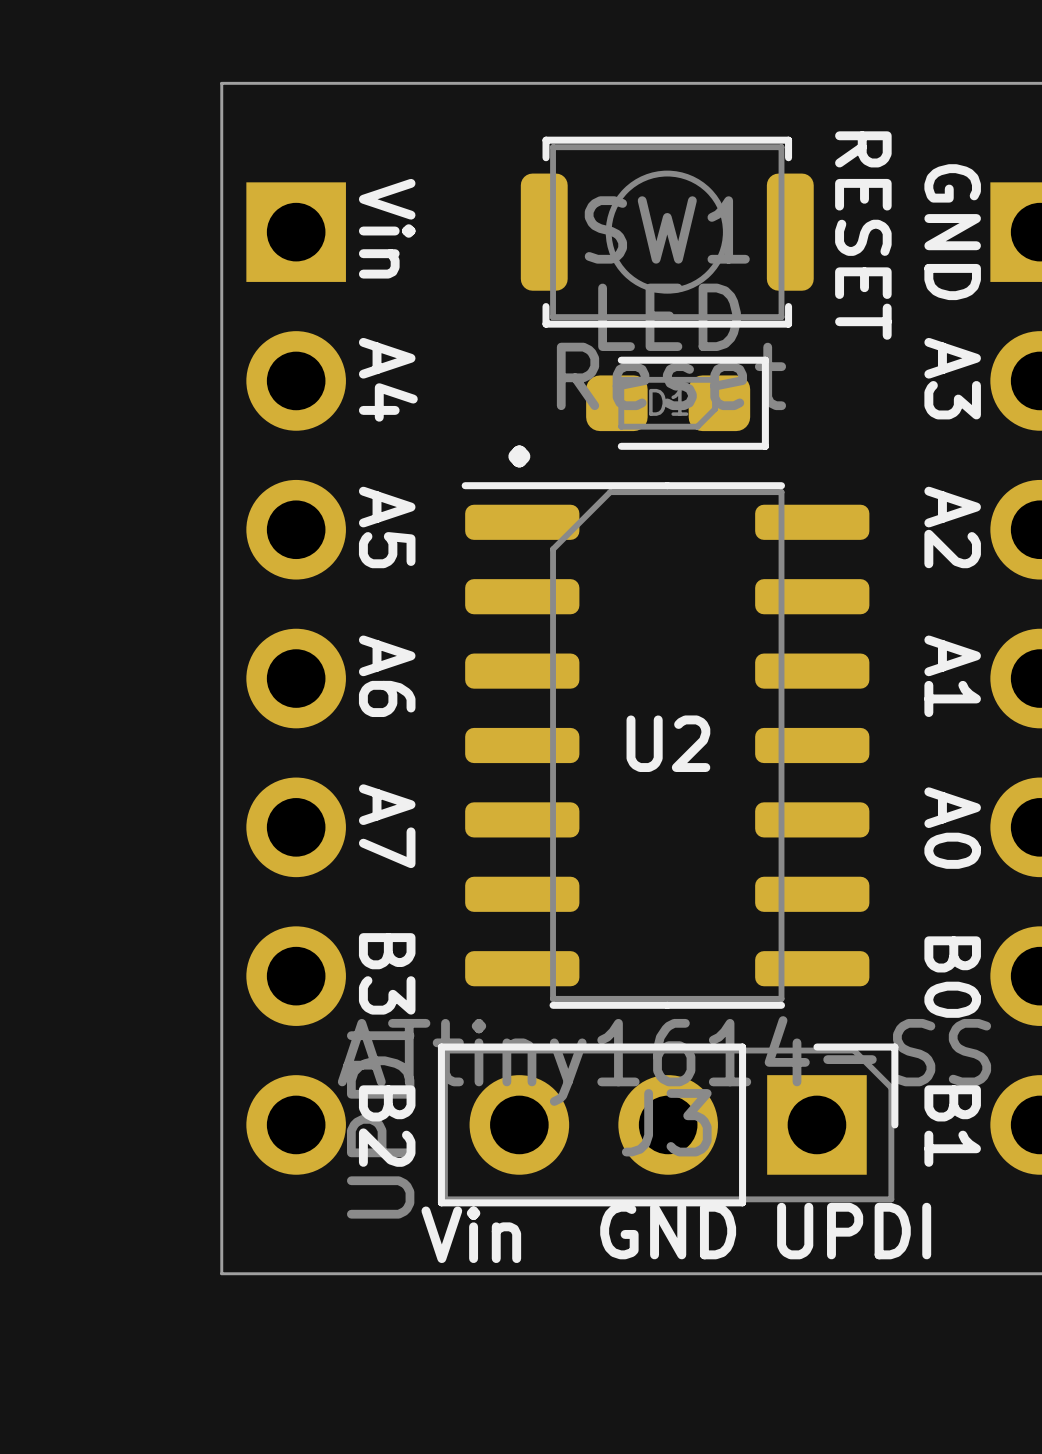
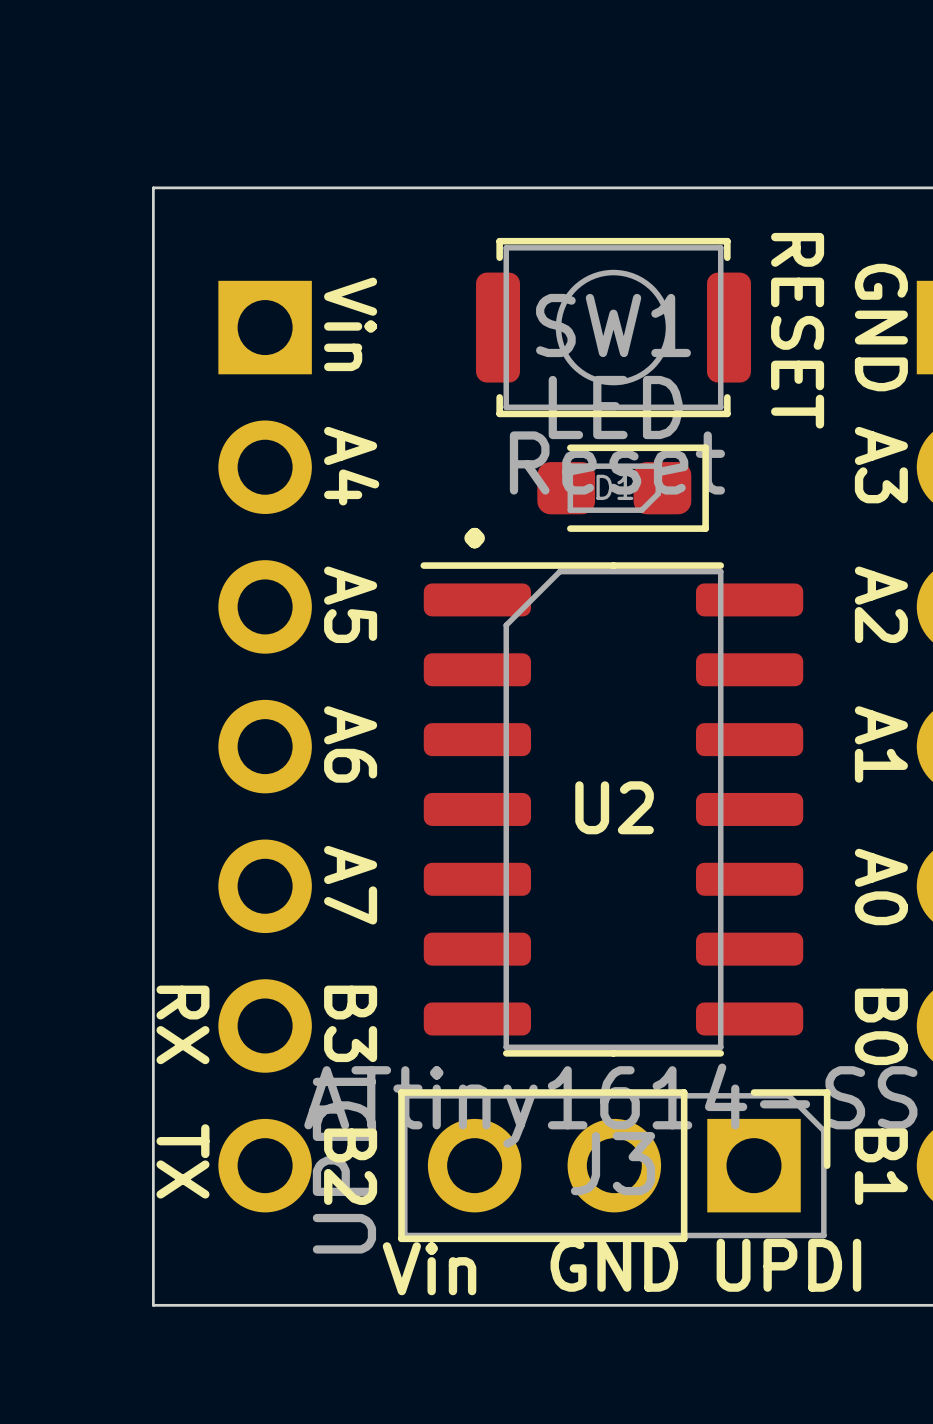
board edge: (221, 83) (221, 1273) -> (195, 187) (153, 187) (153, 1305) (195, 1305)
text: none -> RX (182, 1024)
text: none -> TX (182, 1161)

